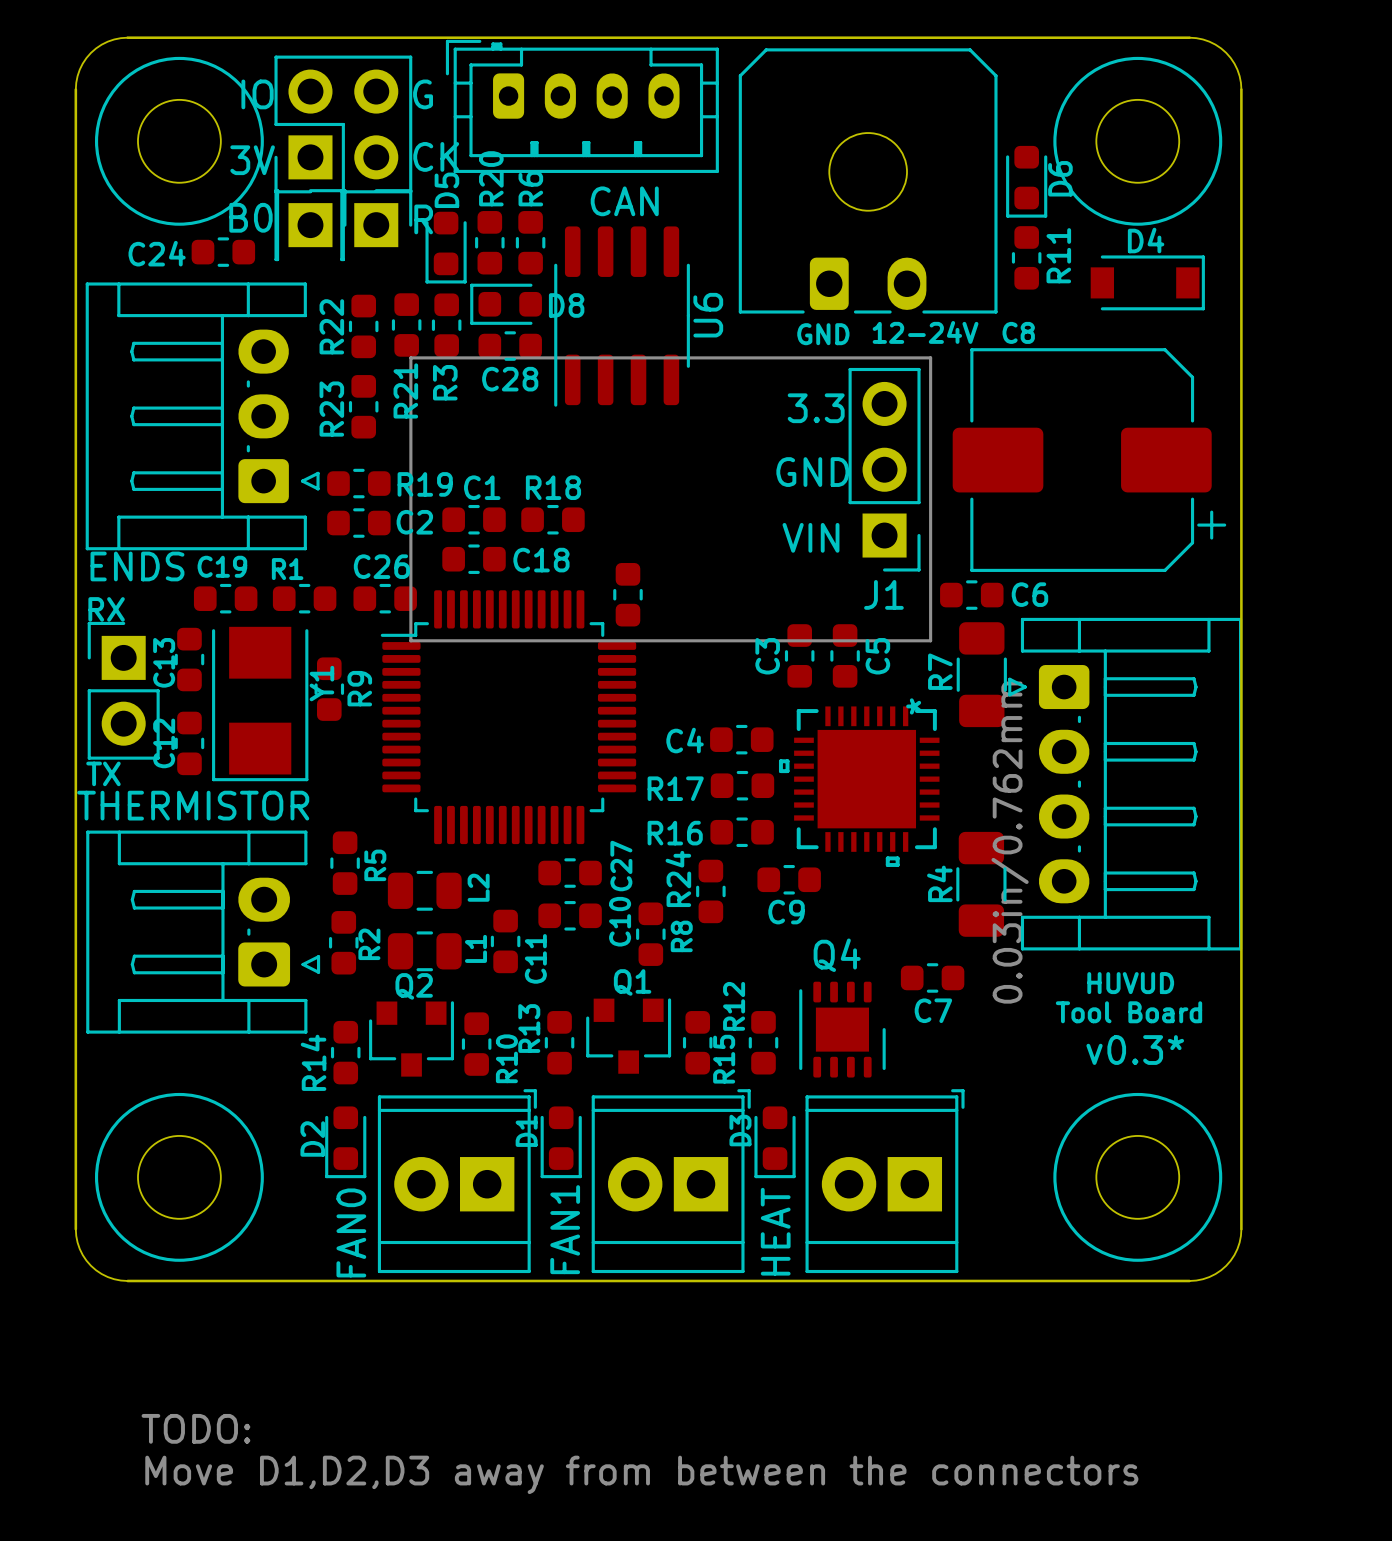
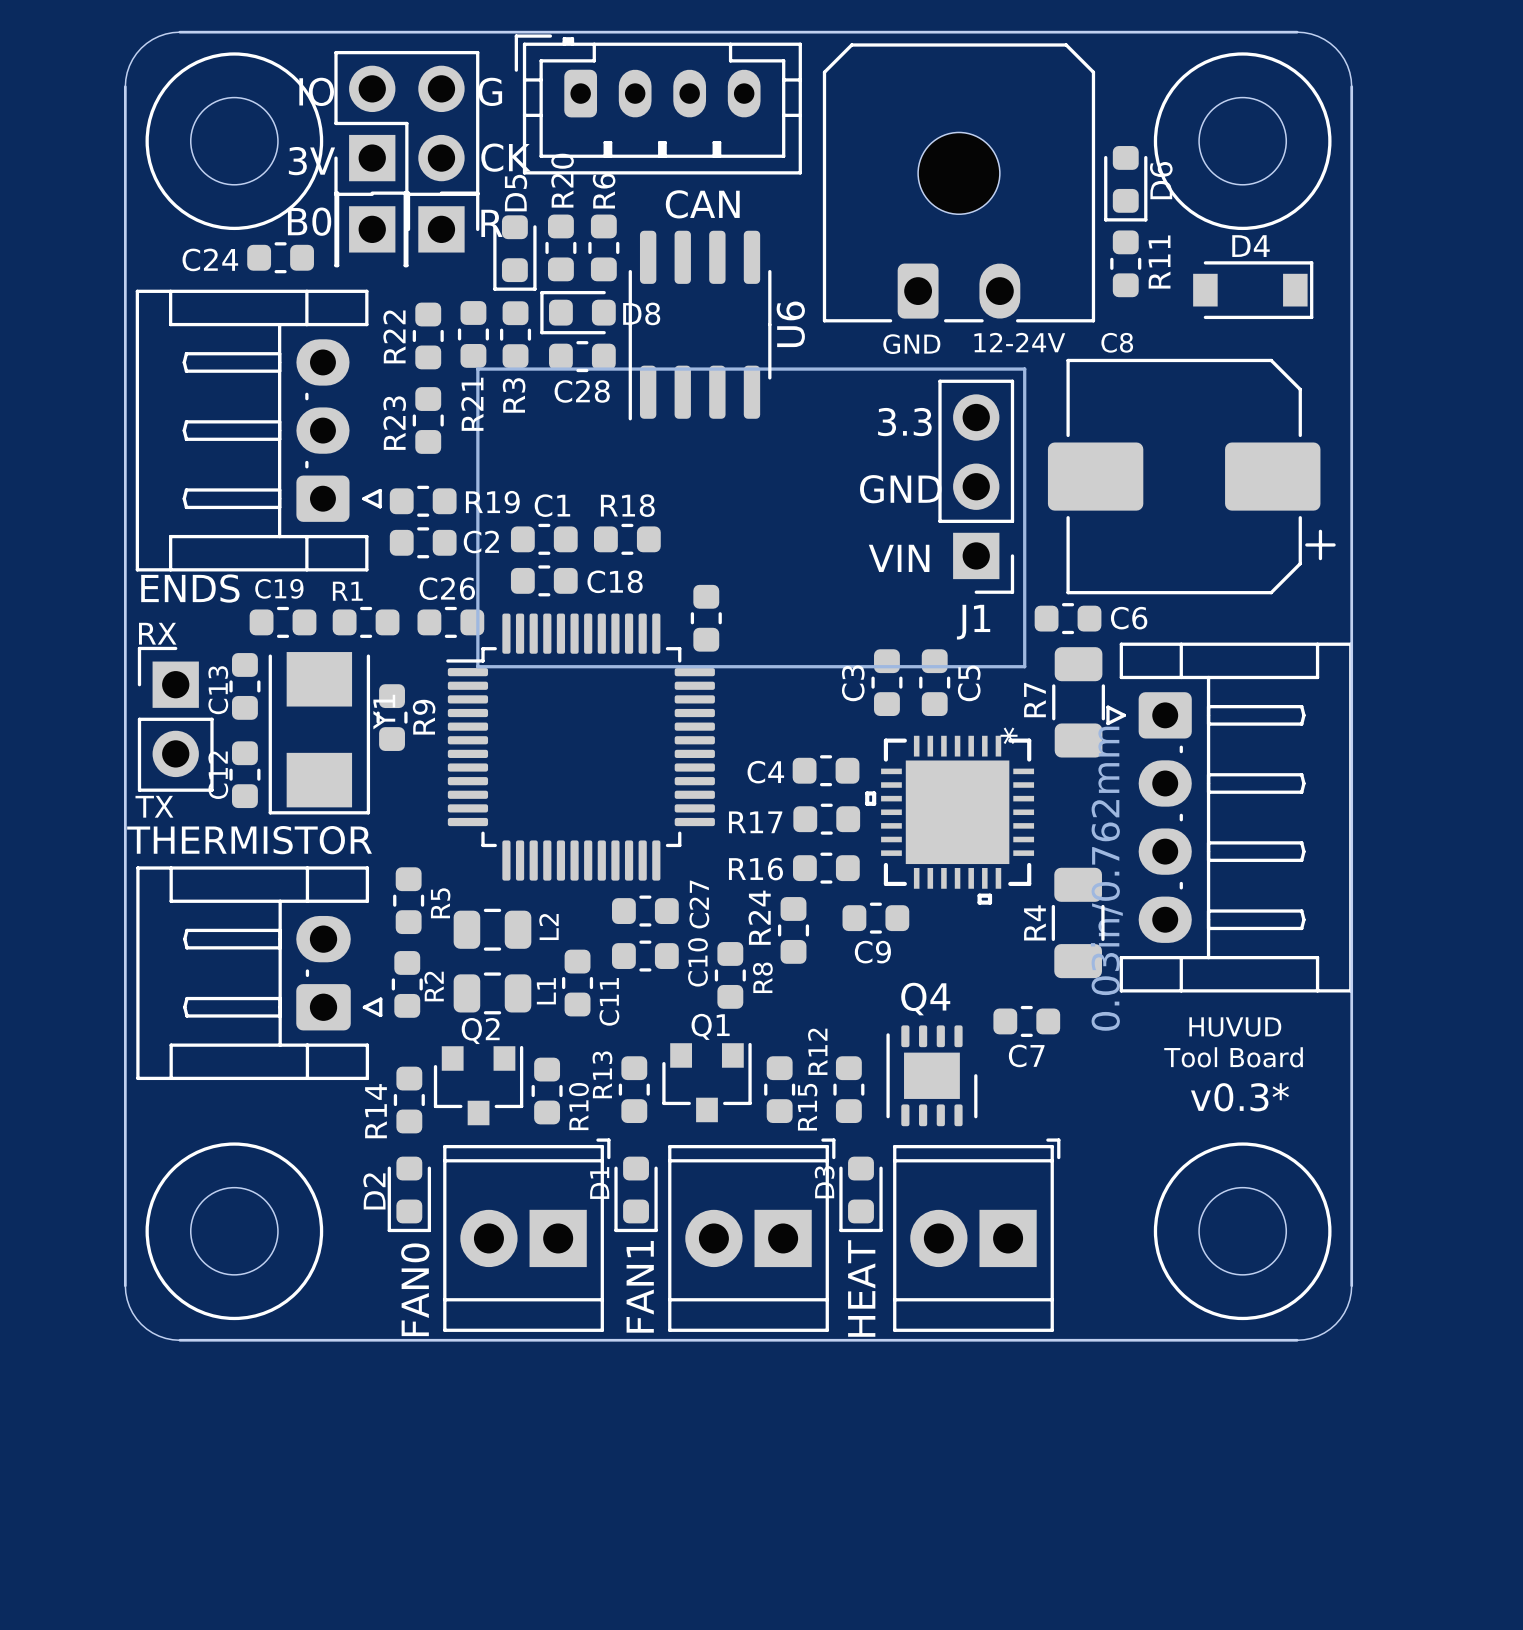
text: TODO: (195, 1428) -> none
text: Move D1,D2,D3 away from between the connectors (641, 1474) -> none

